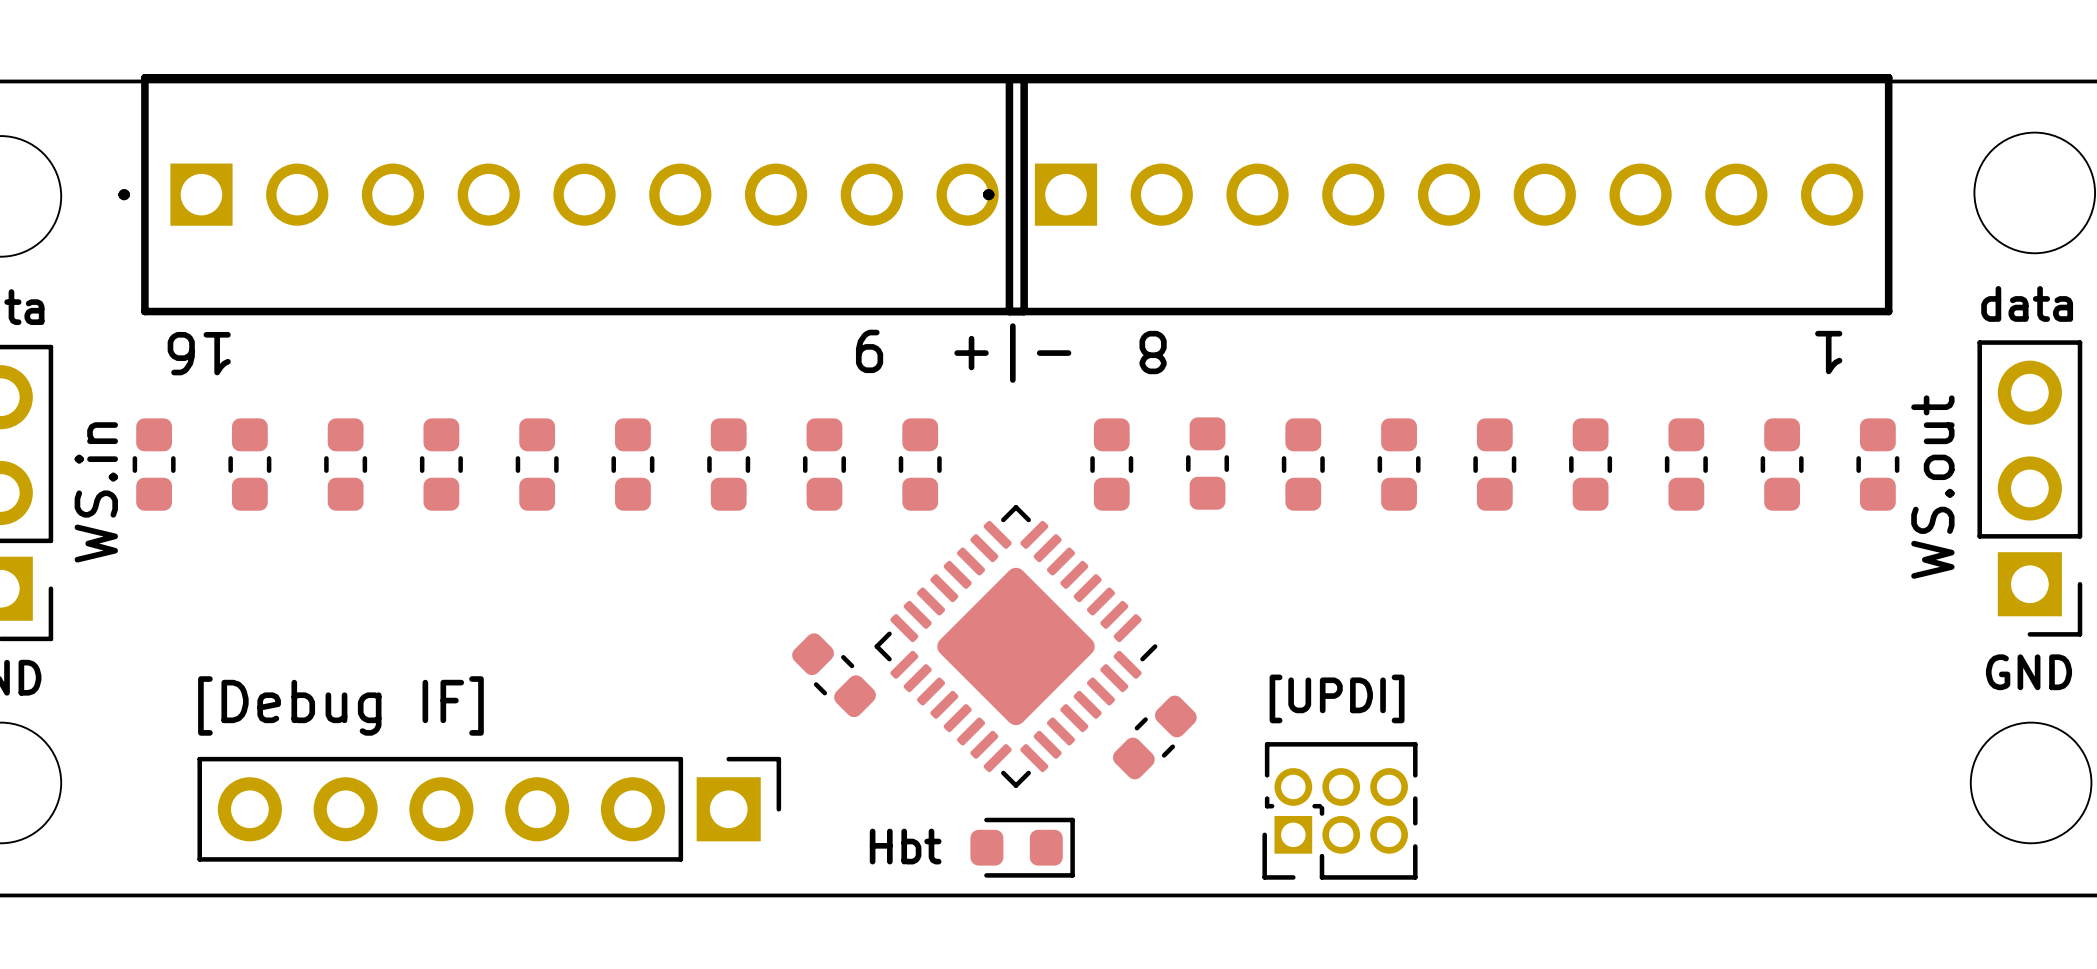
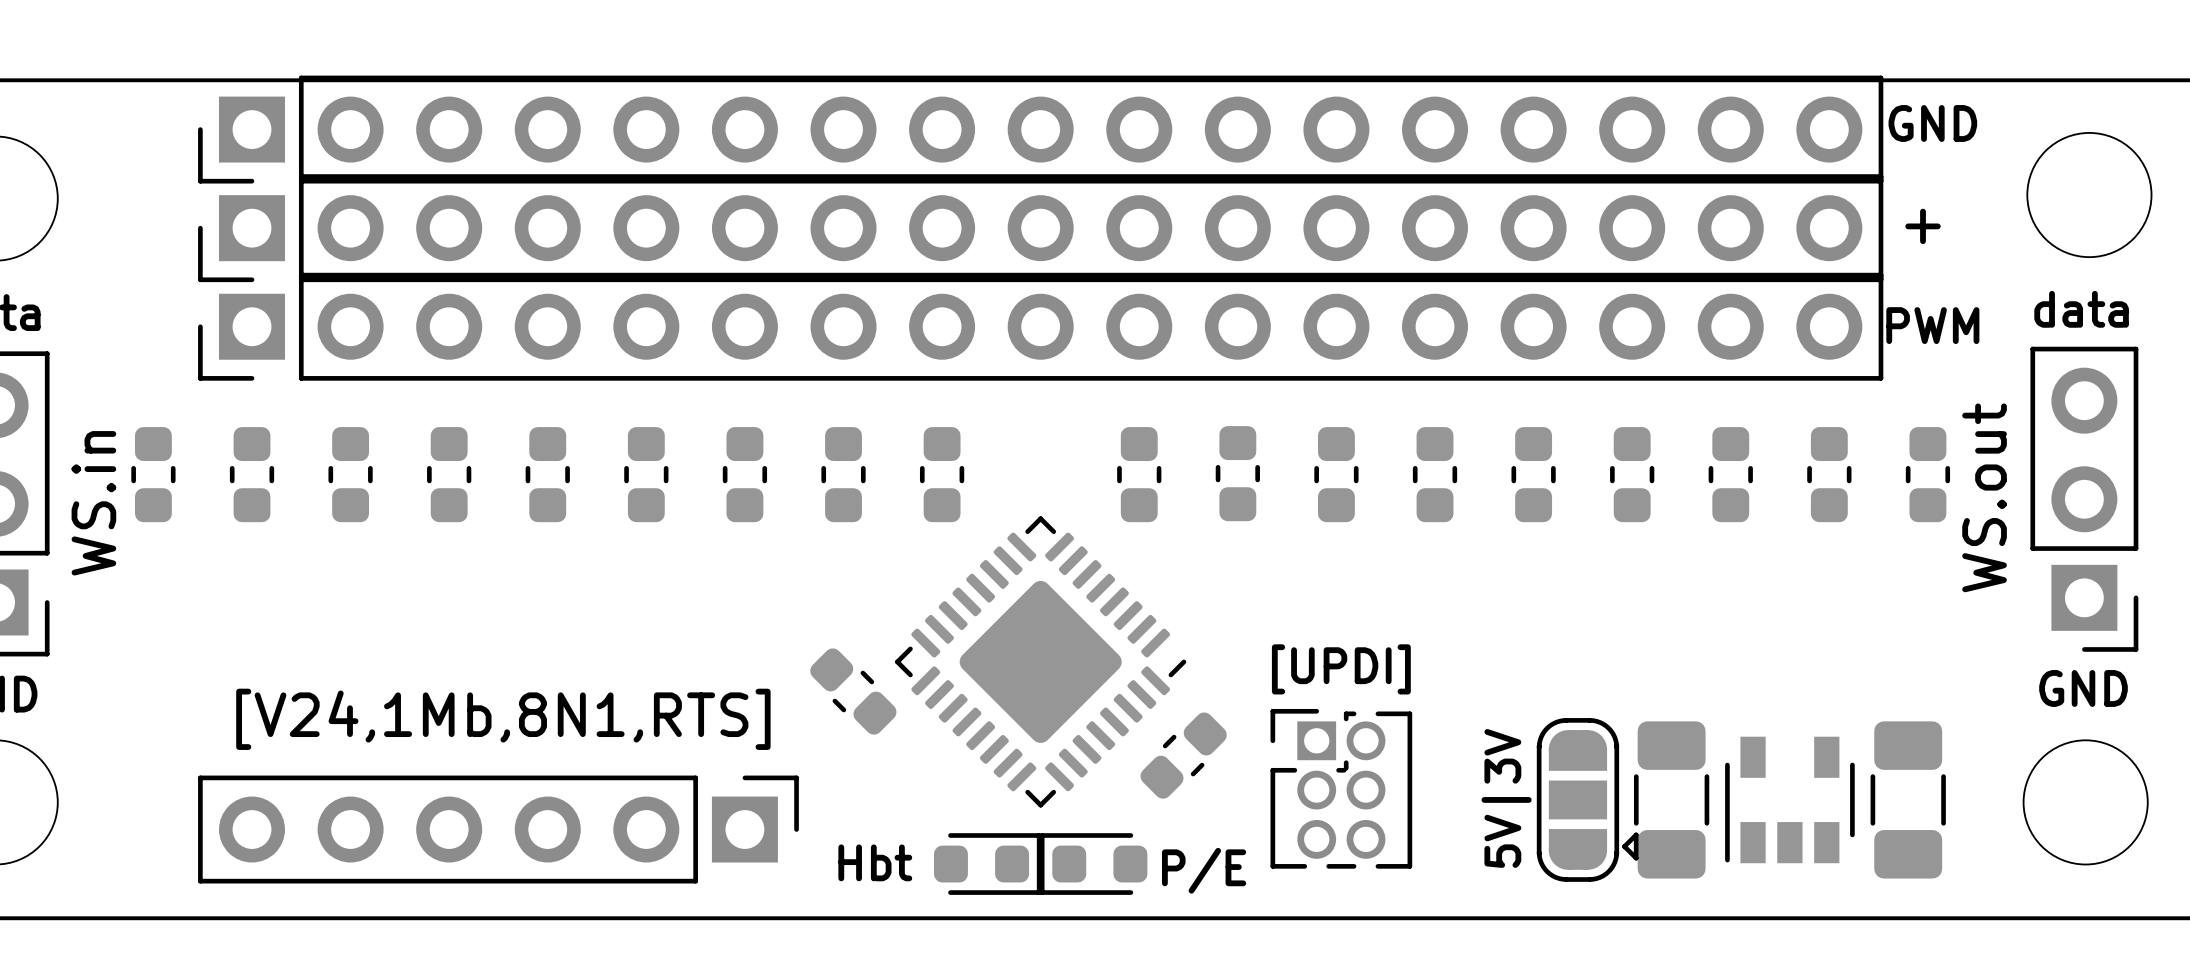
text: none -> GND (1932, 123)
part: none -> (1040, 129)
part: (573, 194) -> none
part: (1437, 194) -> none
text: none -> + (1923, 226)
part: none -> (1040, 228)
text: none -> PWM (1932, 325)
part: none -> (1040, 326)
text: 9 (869, 351) -> none
text: 8 (1153, 352) -> none
text: 1 (1828, 352) -> none
text: 16 (199, 353) -> none
text: +|- (1012, 353) -> none
text position: [UPDI] (1337, 698) -> [UPDI] (1341, 669)
text: none -> [V24,1Mb,8N1,RTS] (503, 719)
text: [Debug IF] (340, 705) -> none
text: none -> 5V|3V (1506, 798)
part: none -> (1587, 799)
part: none -> (1671, 799)
part: none -> (1789, 799)
part: none -> (1908, 799)
part rotation: 0° (1339, 810) -> 90° clockwise (1341, 788)
part: none -> (987, 864)
part: none -> (1093, 864)
text position: Hbt (905, 846) -> Hbt (875, 862)
part: (1022, 847) -> none
text: none -> P/E (1204, 870)

